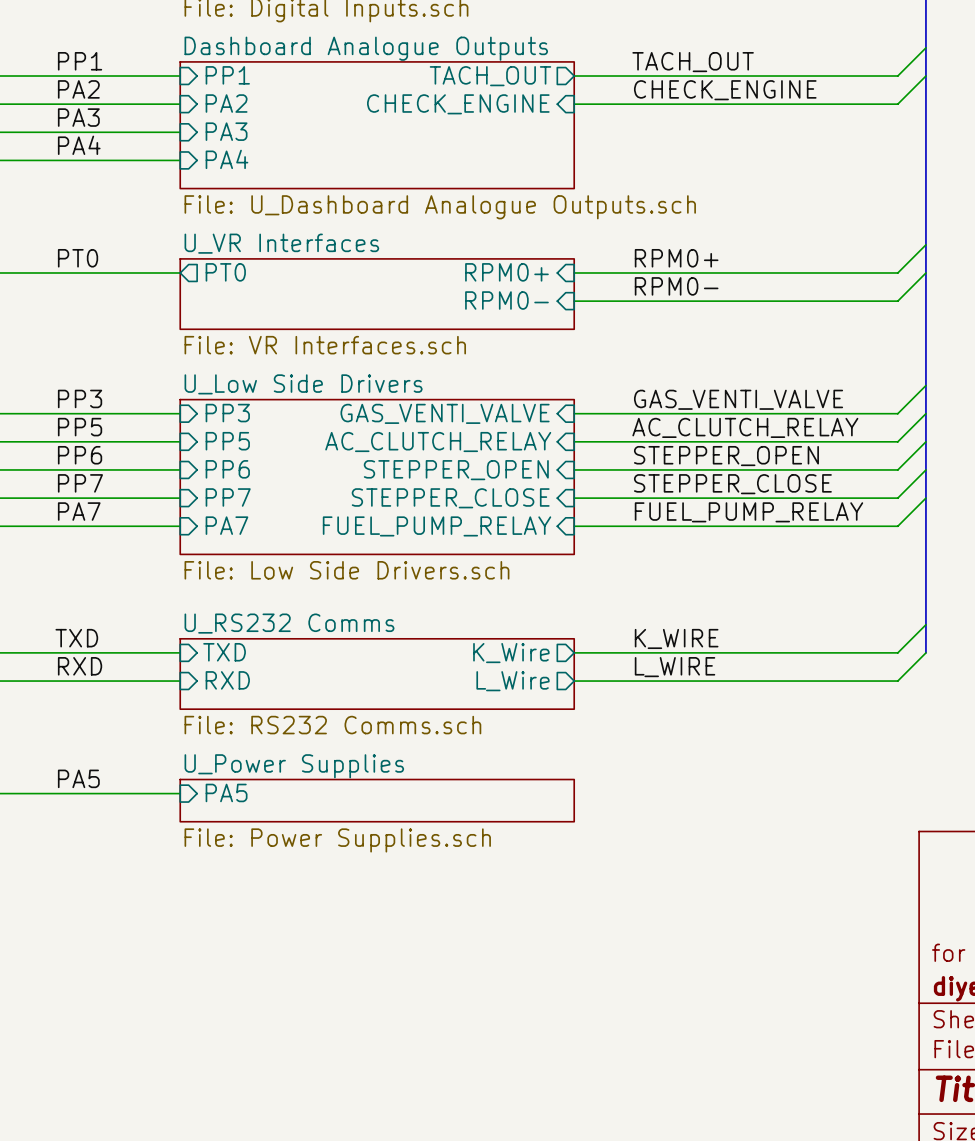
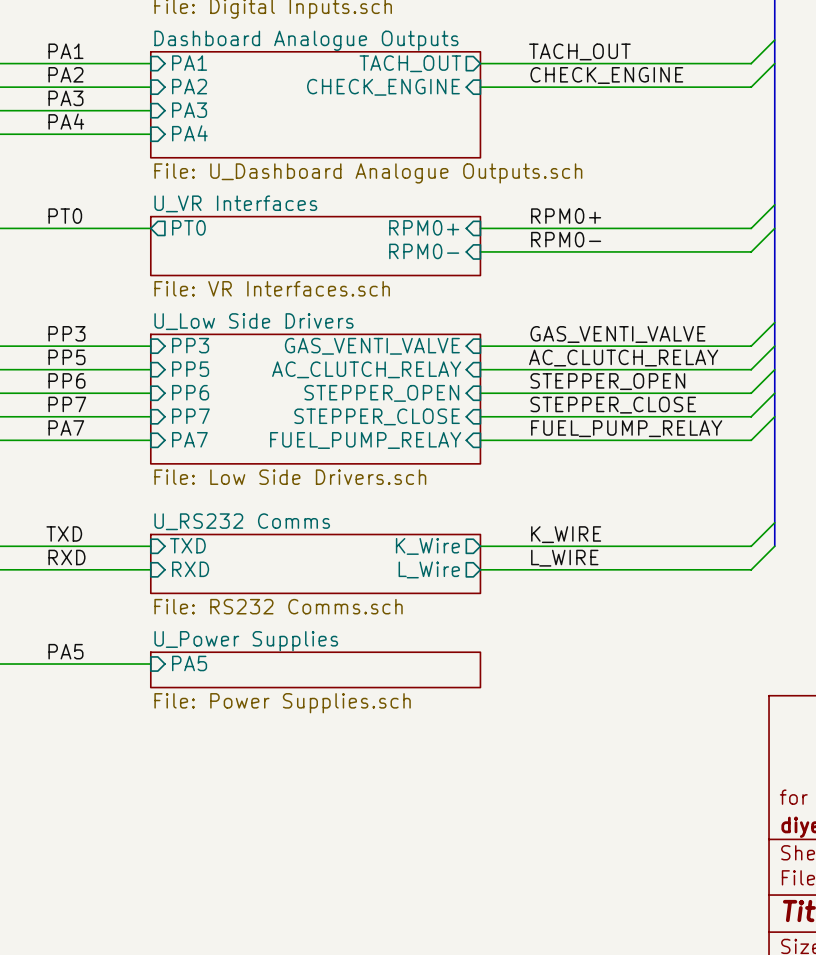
label: PP1 (80, 61) -> PA1 (65, 51)
sheet pin: PP1 (227, 75) -> PA1 (189, 63)

